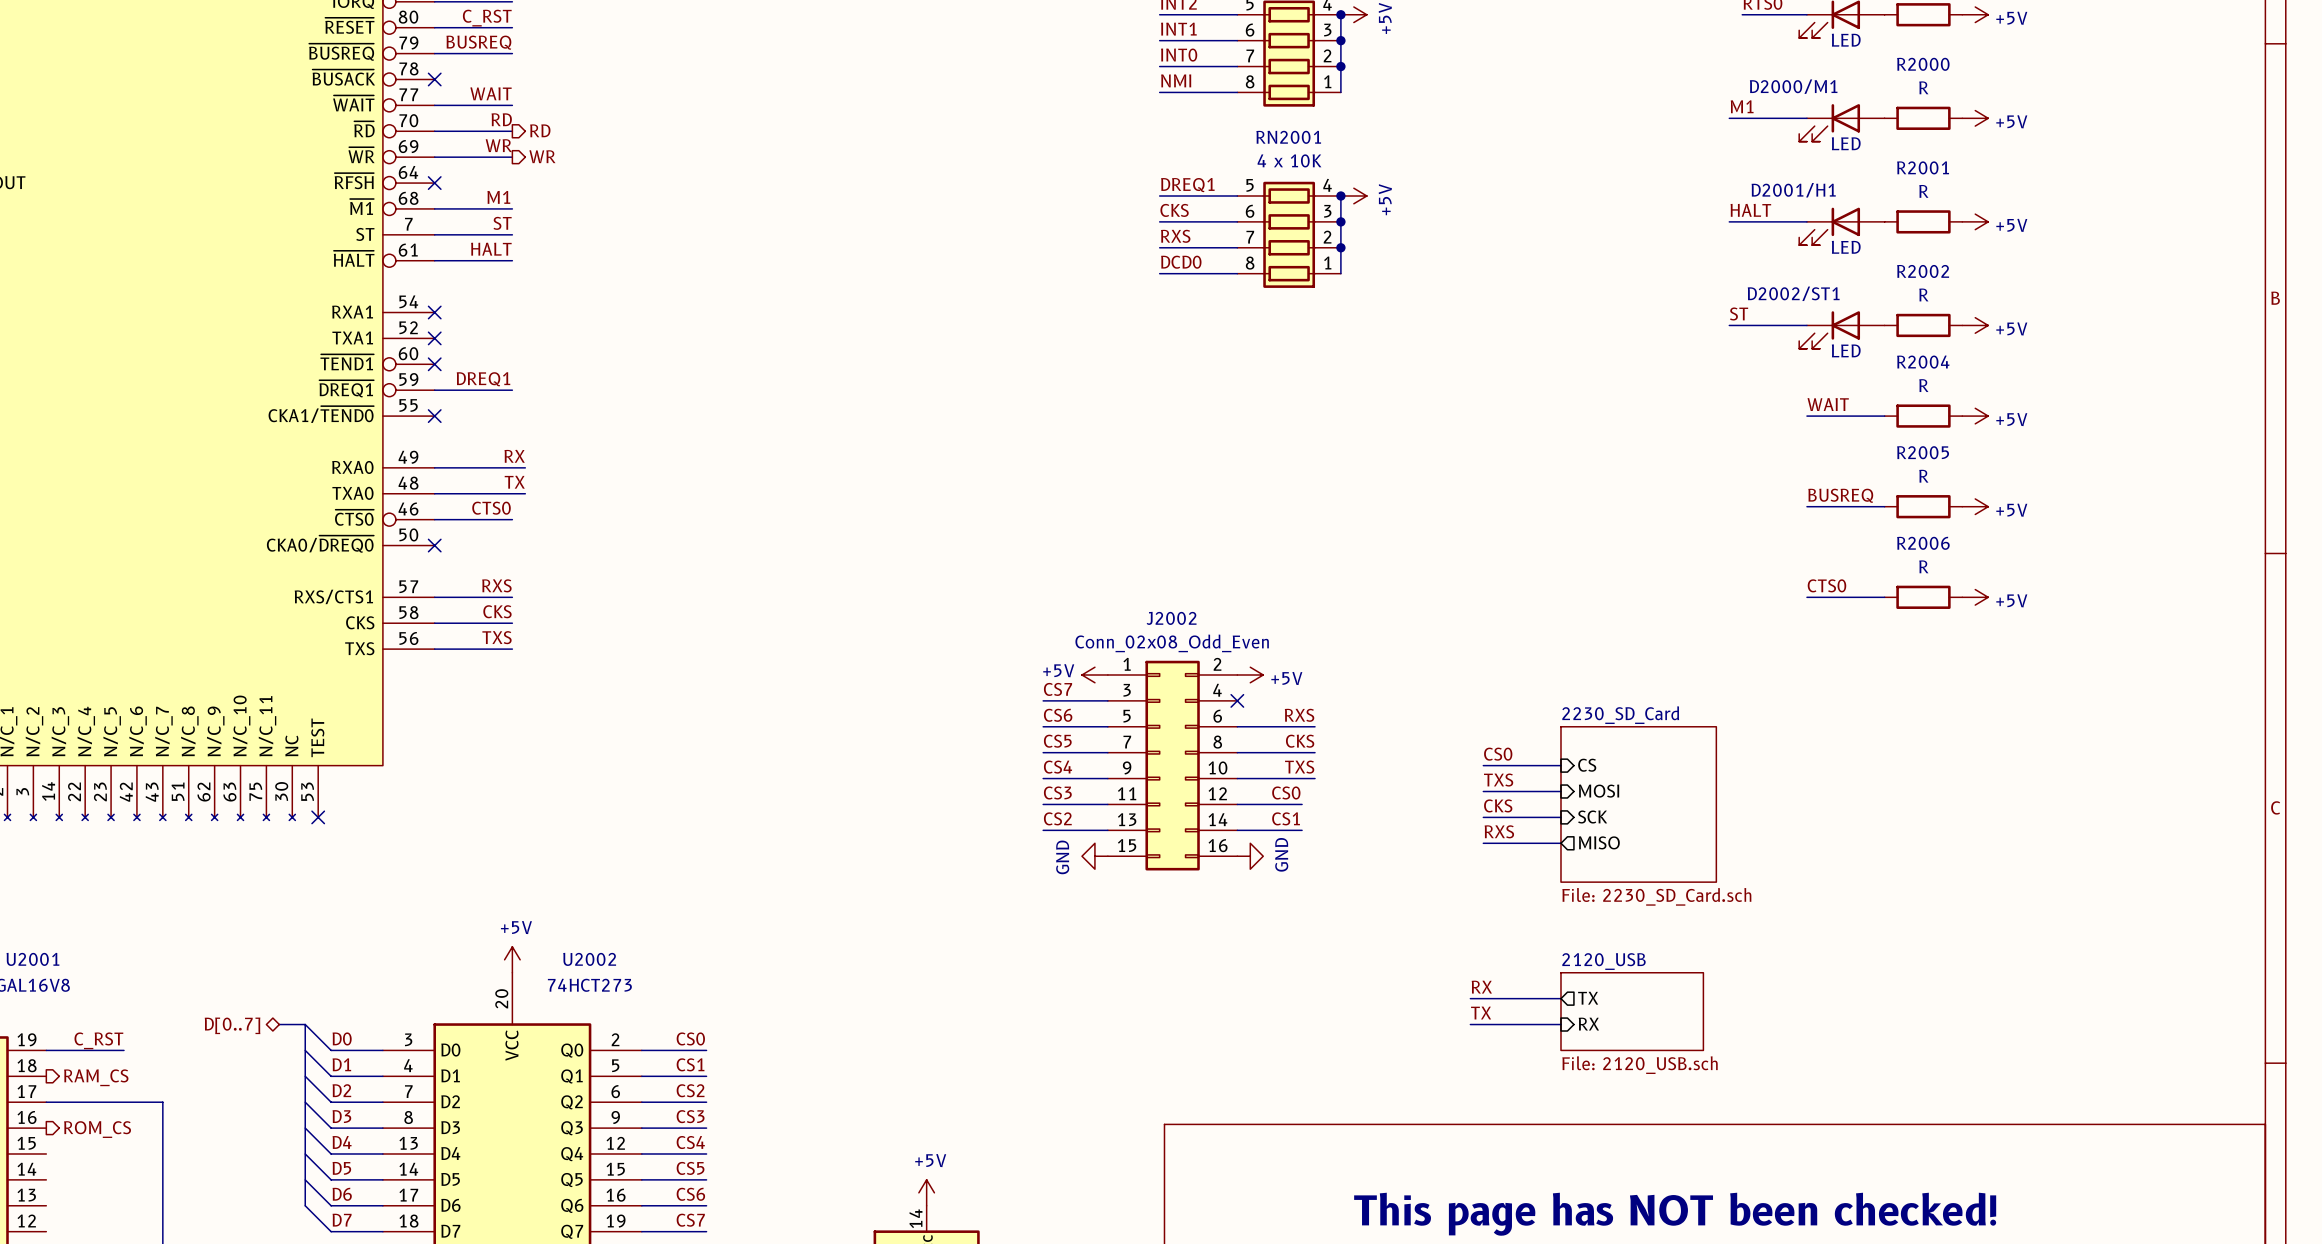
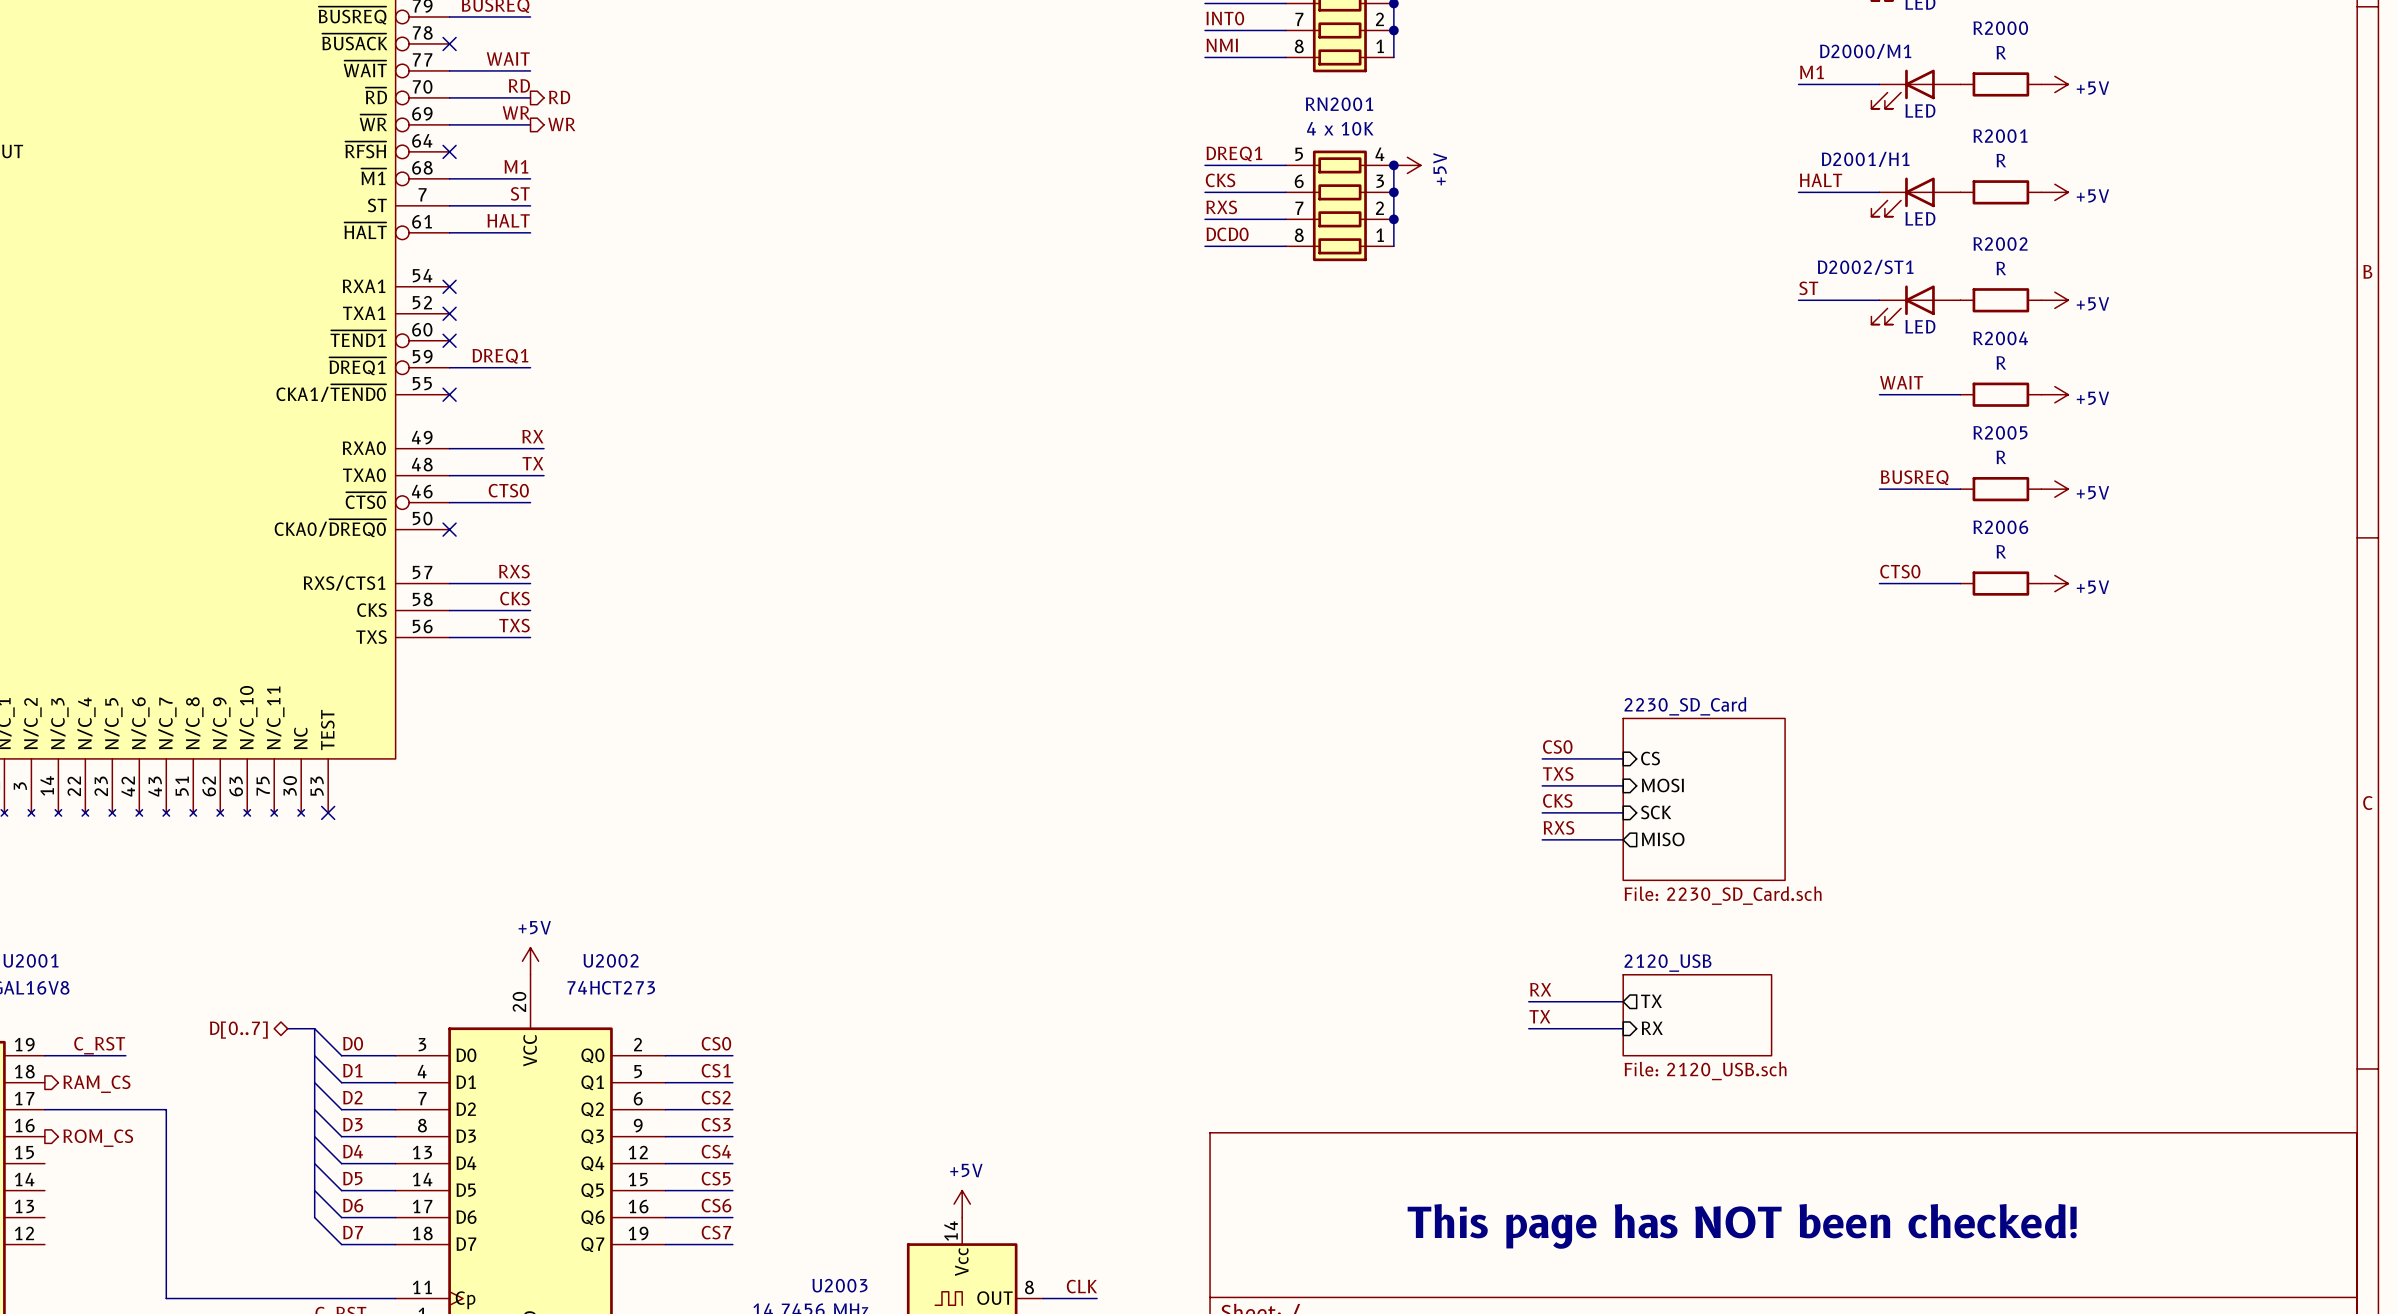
power symbol: +5V (1094, 675) -> none
power symbol: +5V (1250, 675) -> none
label: CS7 (1058, 689) -> none
wire: (1043, 700) (1107, 700) -> none
no-connect mark: (1237, 700) -> none
label: CS6 (1058, 715) -> none
label: RXS (1299, 715) -> none
wire: (1043, 726) (1107, 726) -> none
wire: (1237, 726) (1315, 726) -> none
label: CS5 (1057, 741) -> none
label: CKS (1300, 741) -> none
wire: (1043, 752) (1107, 752) -> none
wire: (1237, 752) (1315, 752) -> none
J2002: Conn_02x08_Odd_Even (1172, 765) -> none
label: CS4 (1058, 767) -> none
label: TXS (1299, 767) -> none
wire: (1043, 778) (1107, 778) -> none
wire: (1237, 778) (1315, 778) -> none
label: CS3 (1057, 792) -> none
label: CS0 (1286, 792) -> none
wire: (1043, 804) (1107, 804) -> none
wire: (1237, 804) (1302, 804) -> none
label: CS2 (1057, 818) -> none
label: CS1 (1286, 818) -> none
wire: (1043, 830) (1107, 830) -> none
wire: (1237, 830) (1302, 830) -> none
power symbol: GND (1094, 856) -> none
power symbol: GND (1250, 856) -> none

